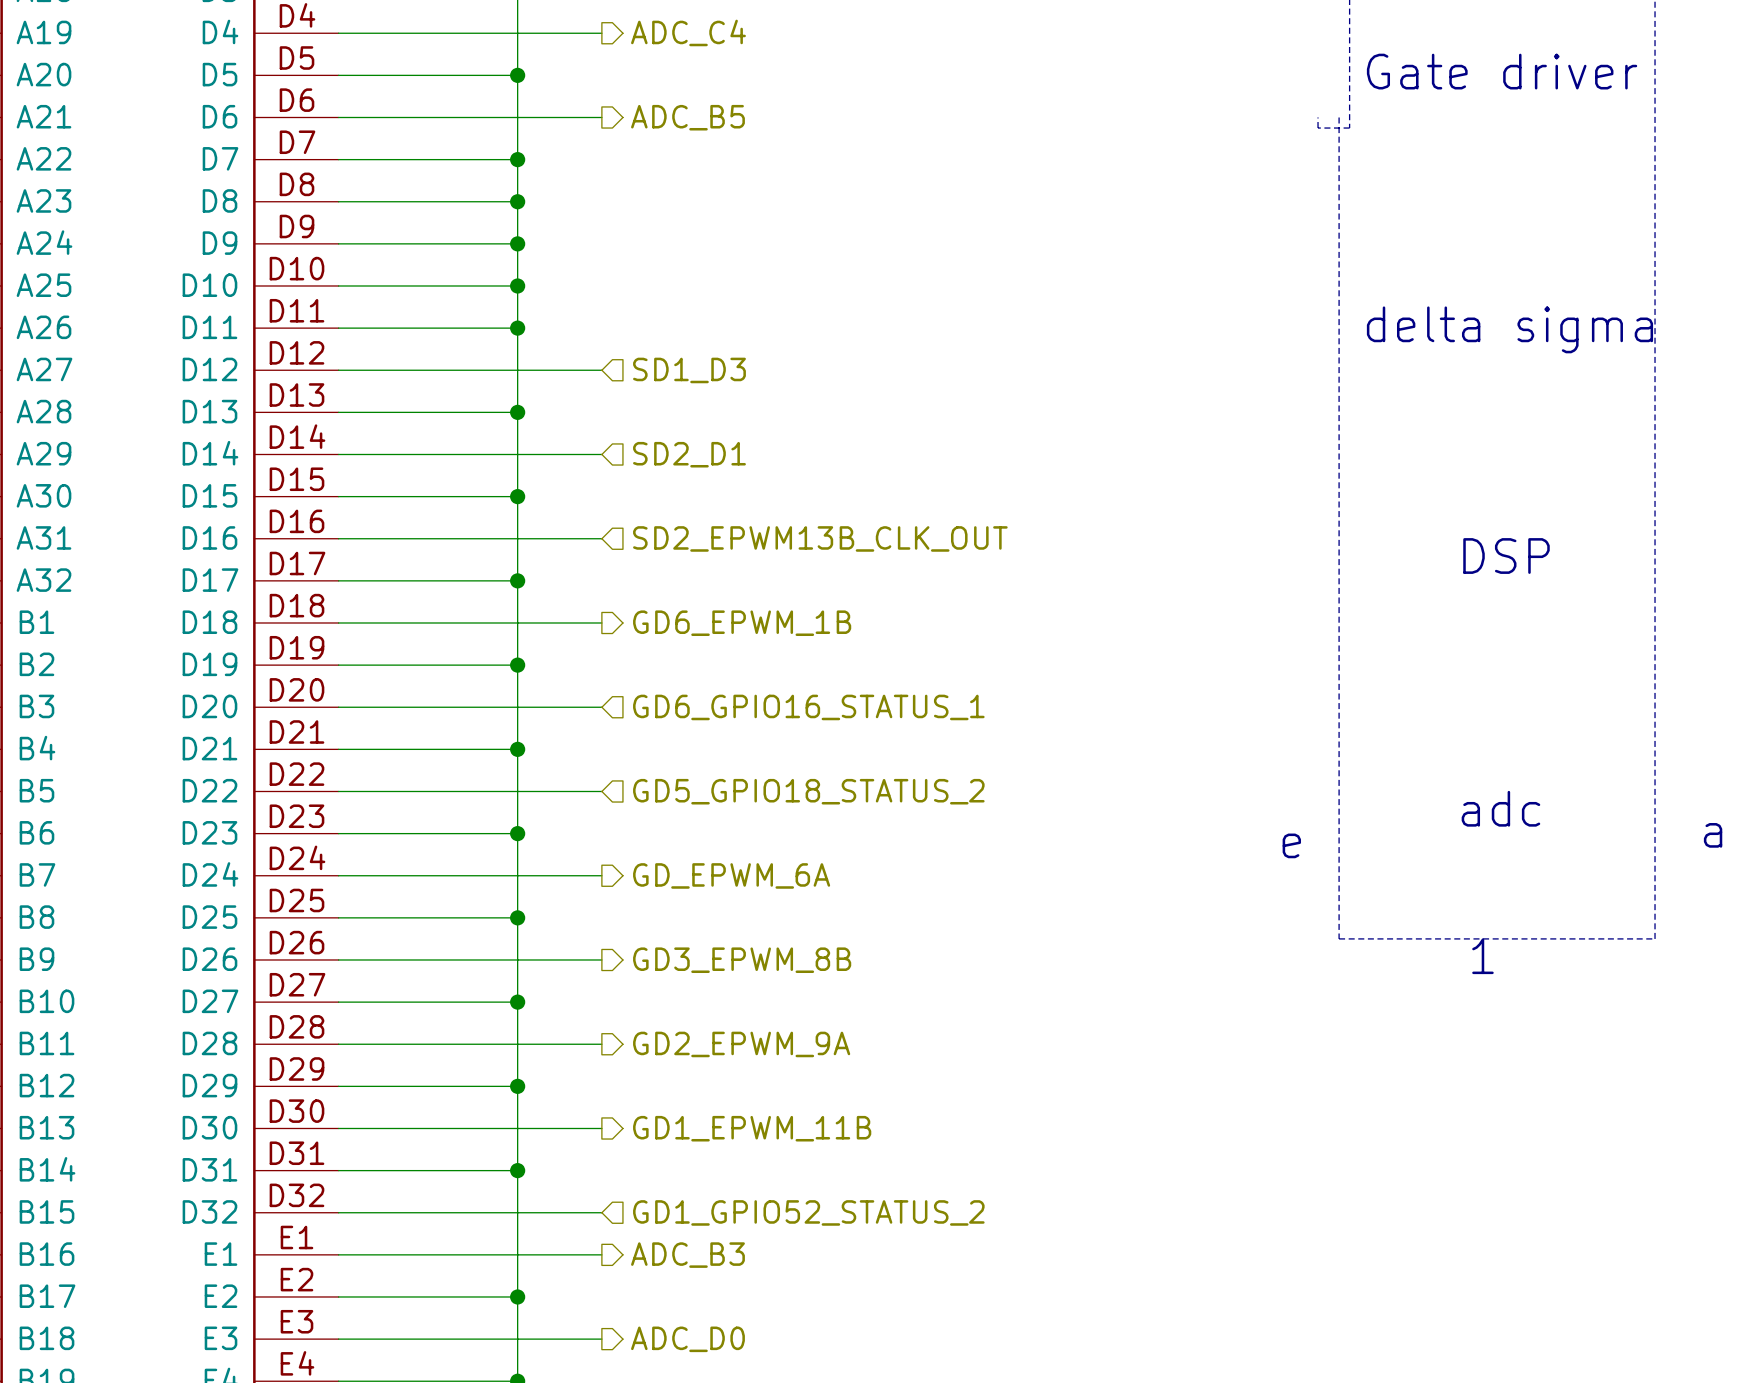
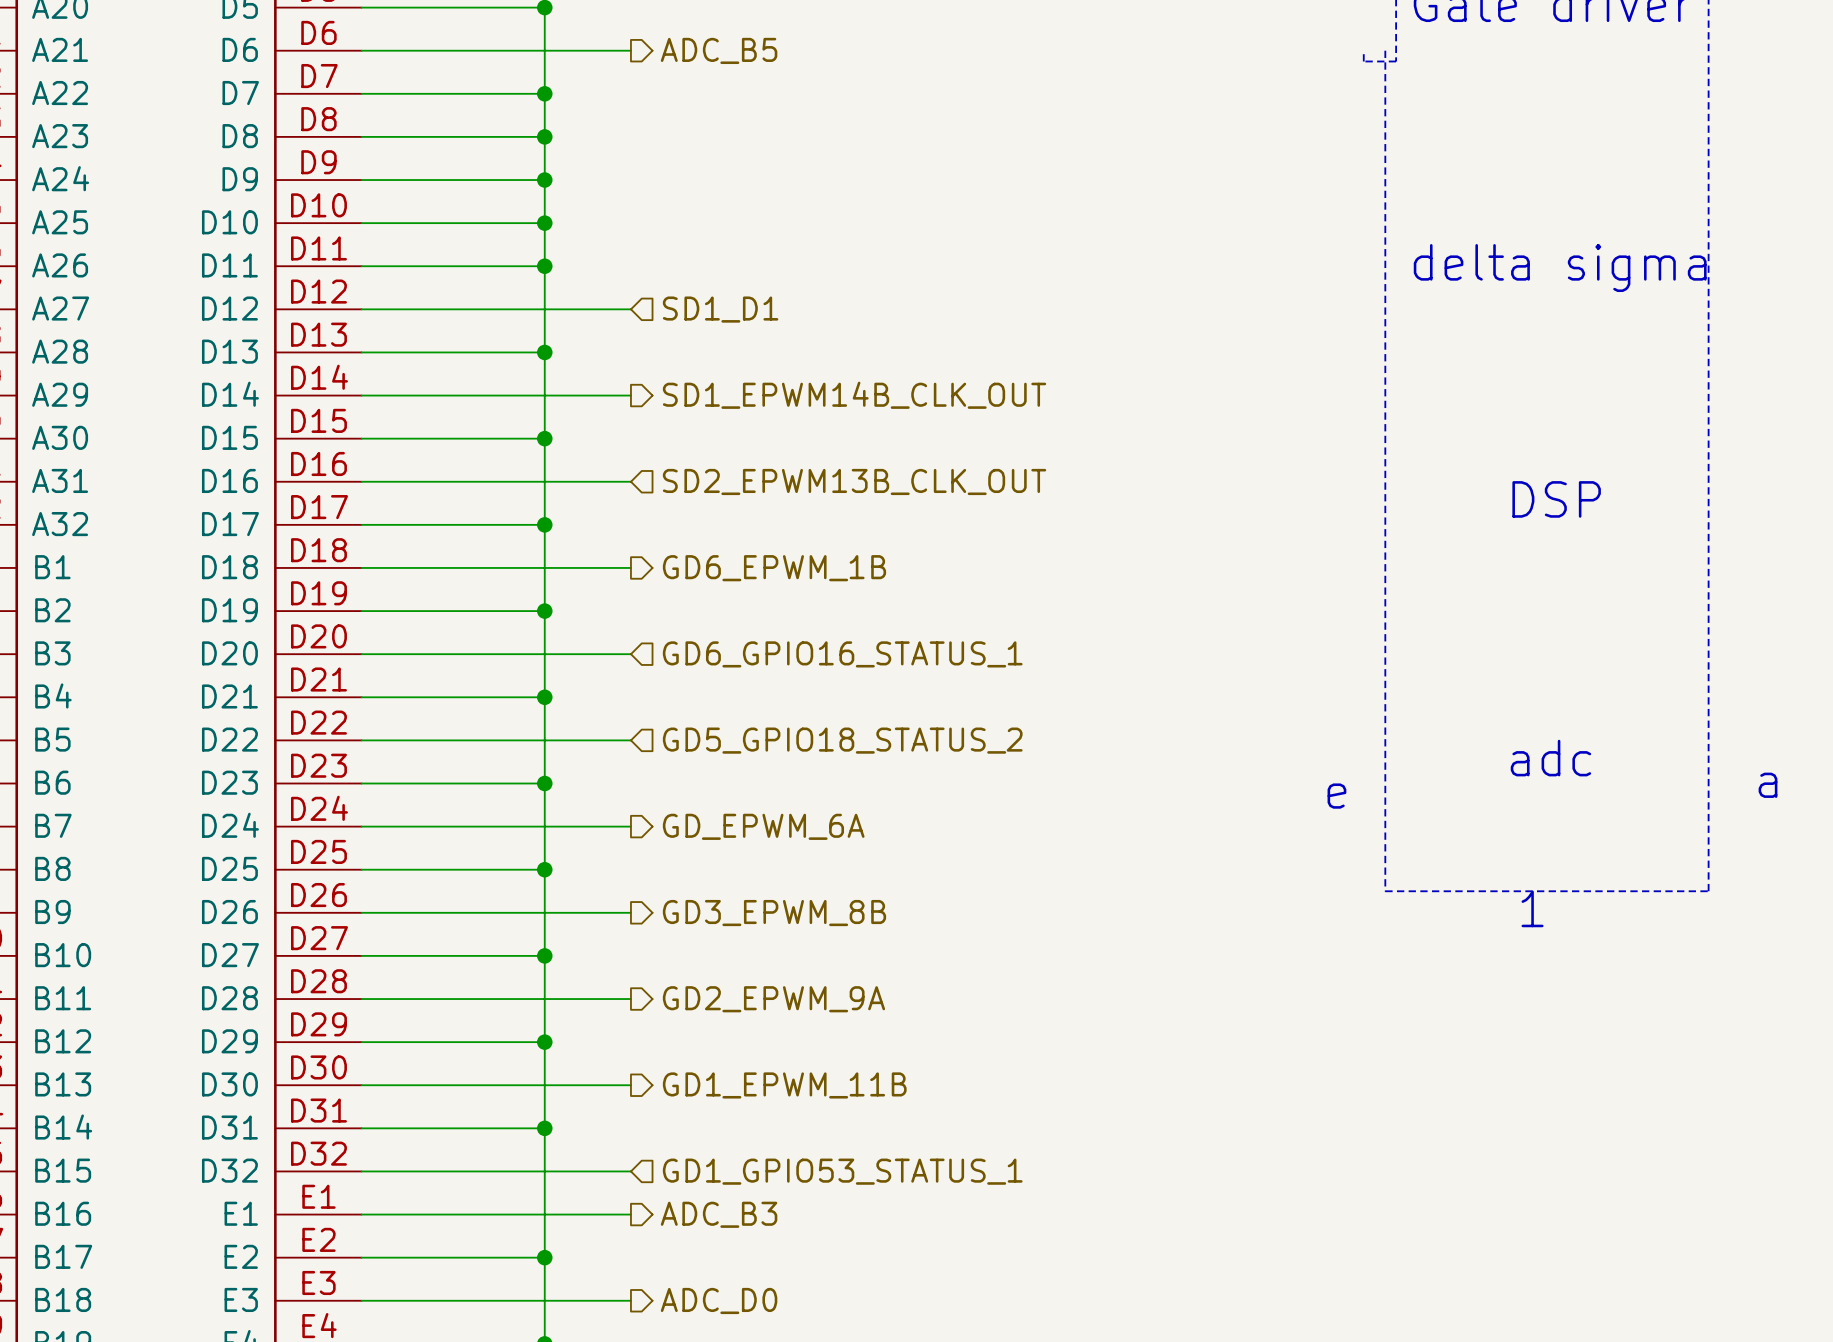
hierarchical label: SD1_D3 (689, 370) -> SD1_D1 (720, 309)
hierarchical label shape: input (689, 454) -> output (854, 395)
hierarchical label: SD2_D1 (689, 454) -> SD1_EPWM14B_CLK_OUT (854, 395)
hierarchical label: GD1_GPIO52_STATUS_2 (808, 1212) -> GD1_GPIO53_STATUS_1 (842, 1171)

